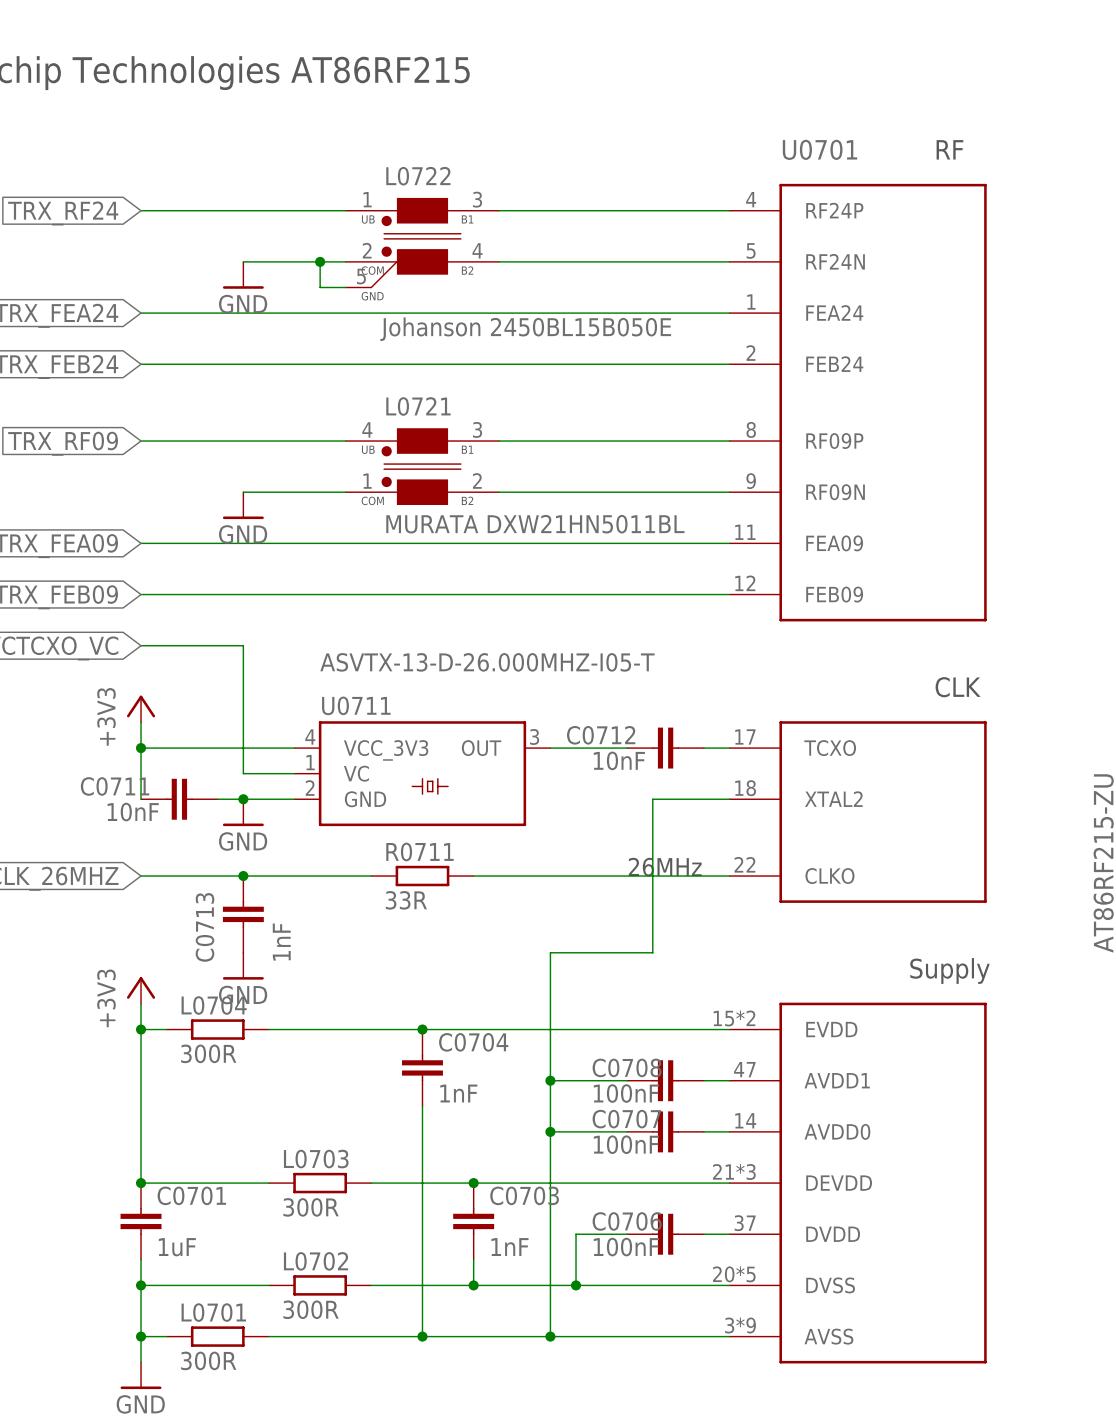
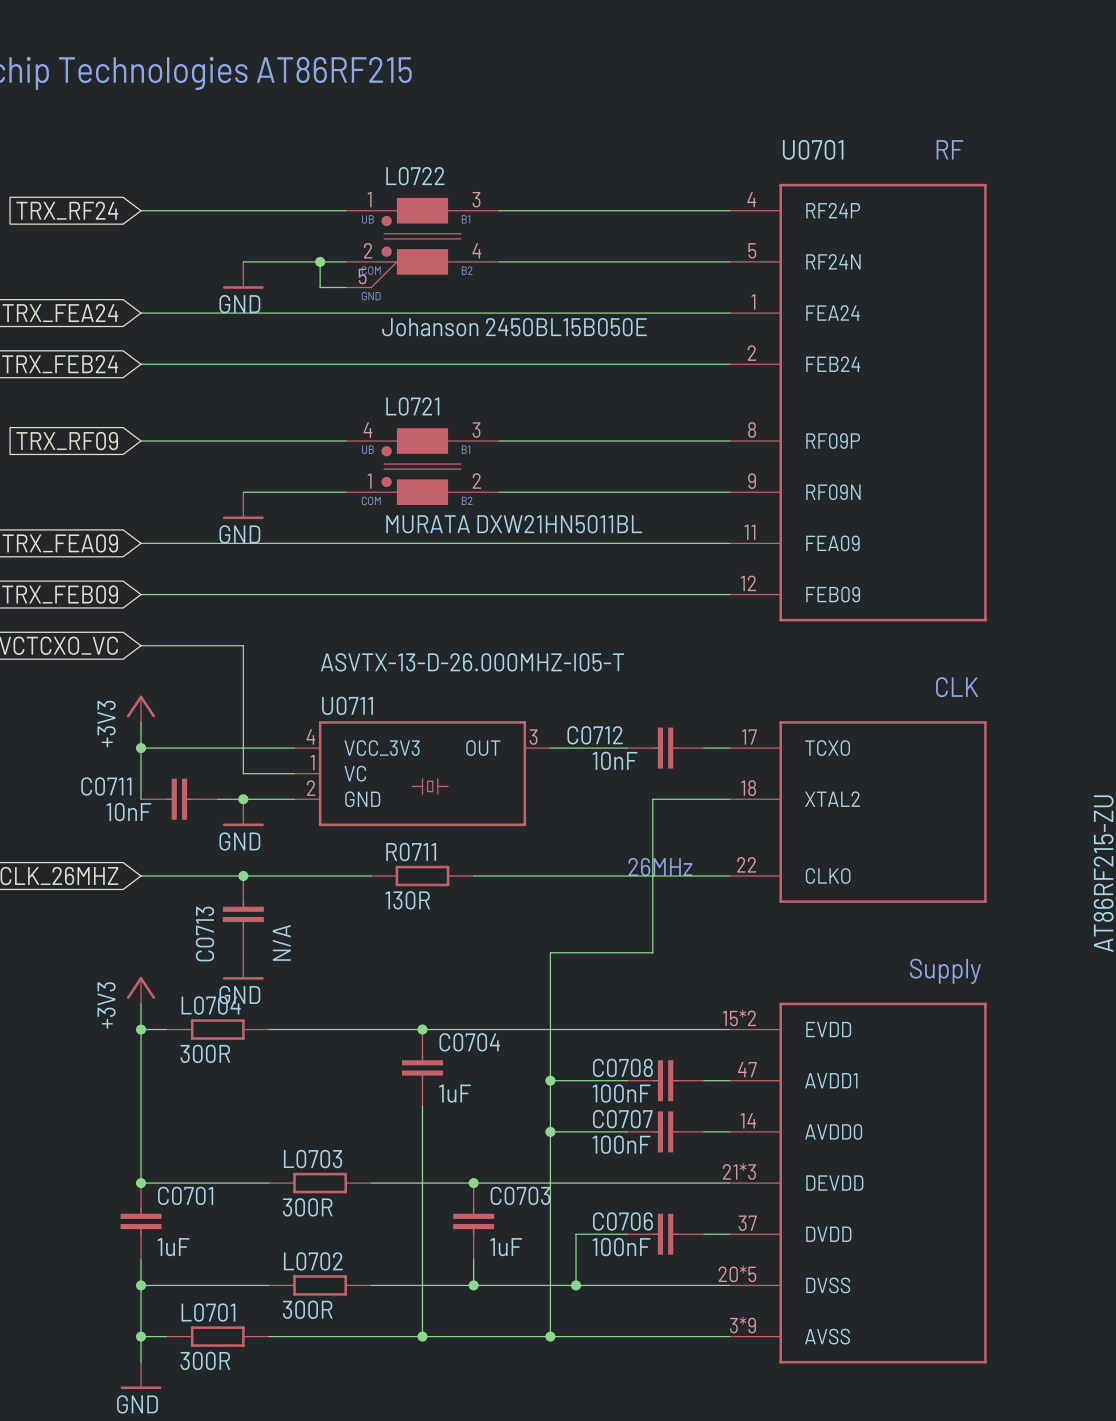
R0711 value: 33R (406, 900) -> 130R (407, 900)
C0713 value: 1nF (281, 942) -> N/A (281, 942)
C0704 value: 1nF (458, 1093) -> 1uF (454, 1093)
C0703 value: 1nF (509, 1247) -> 1uF (506, 1247)

